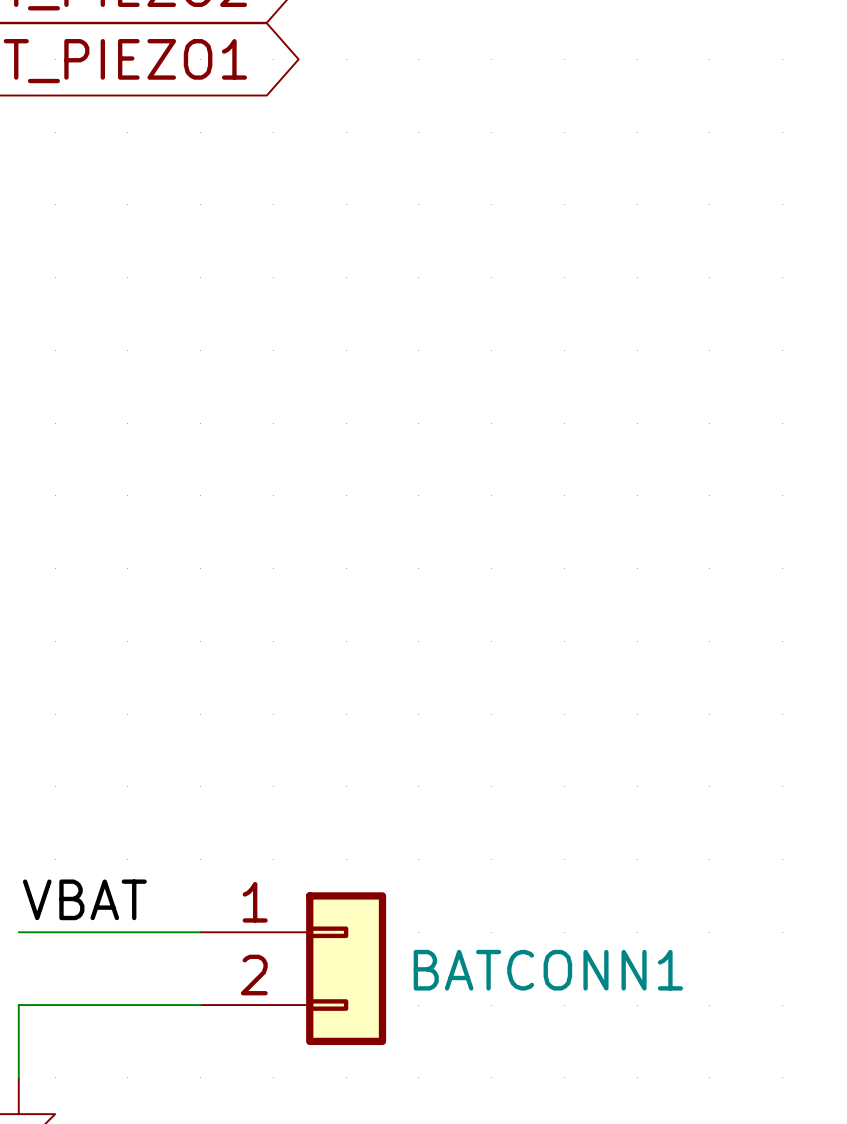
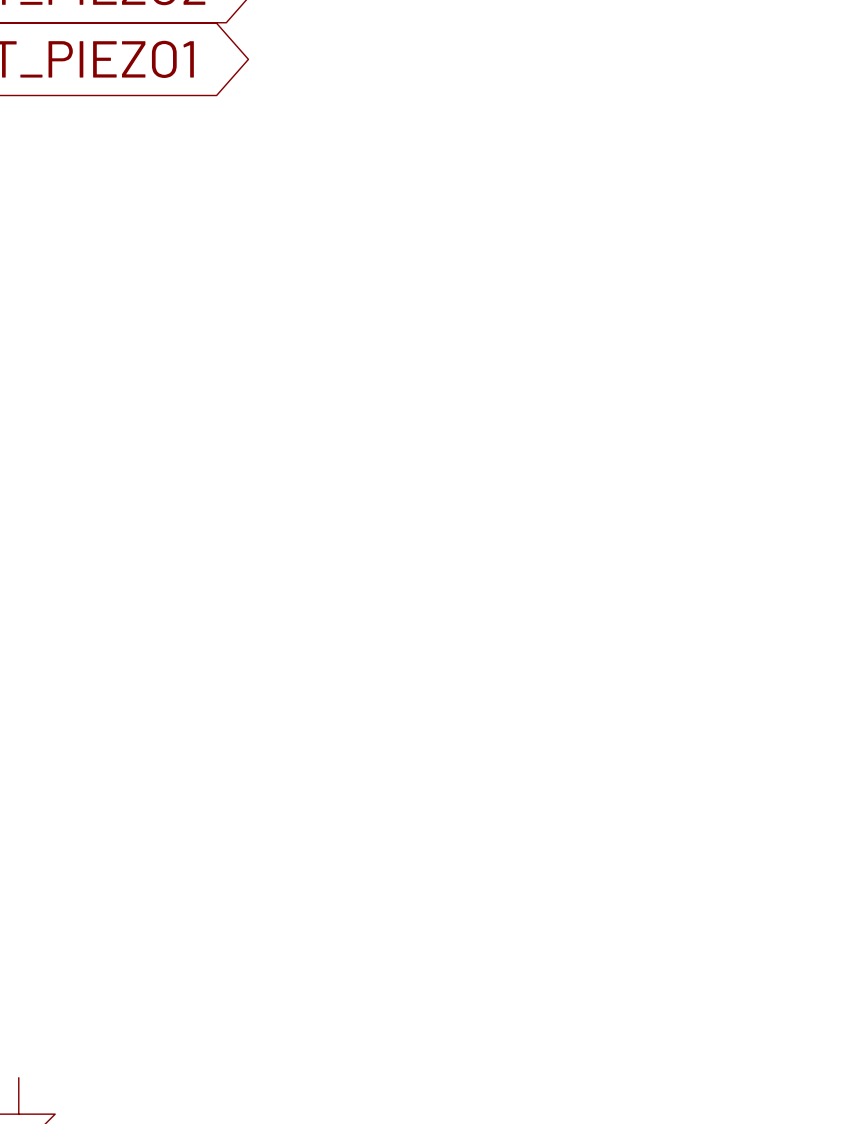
label: VBAT (84, 899) -> none
wire: (18, 932) (200, 932) -> none
BATCONN1: (293, 968) -> none
wire: (200, 1005) (18, 1005) (18, 1077) -> none

